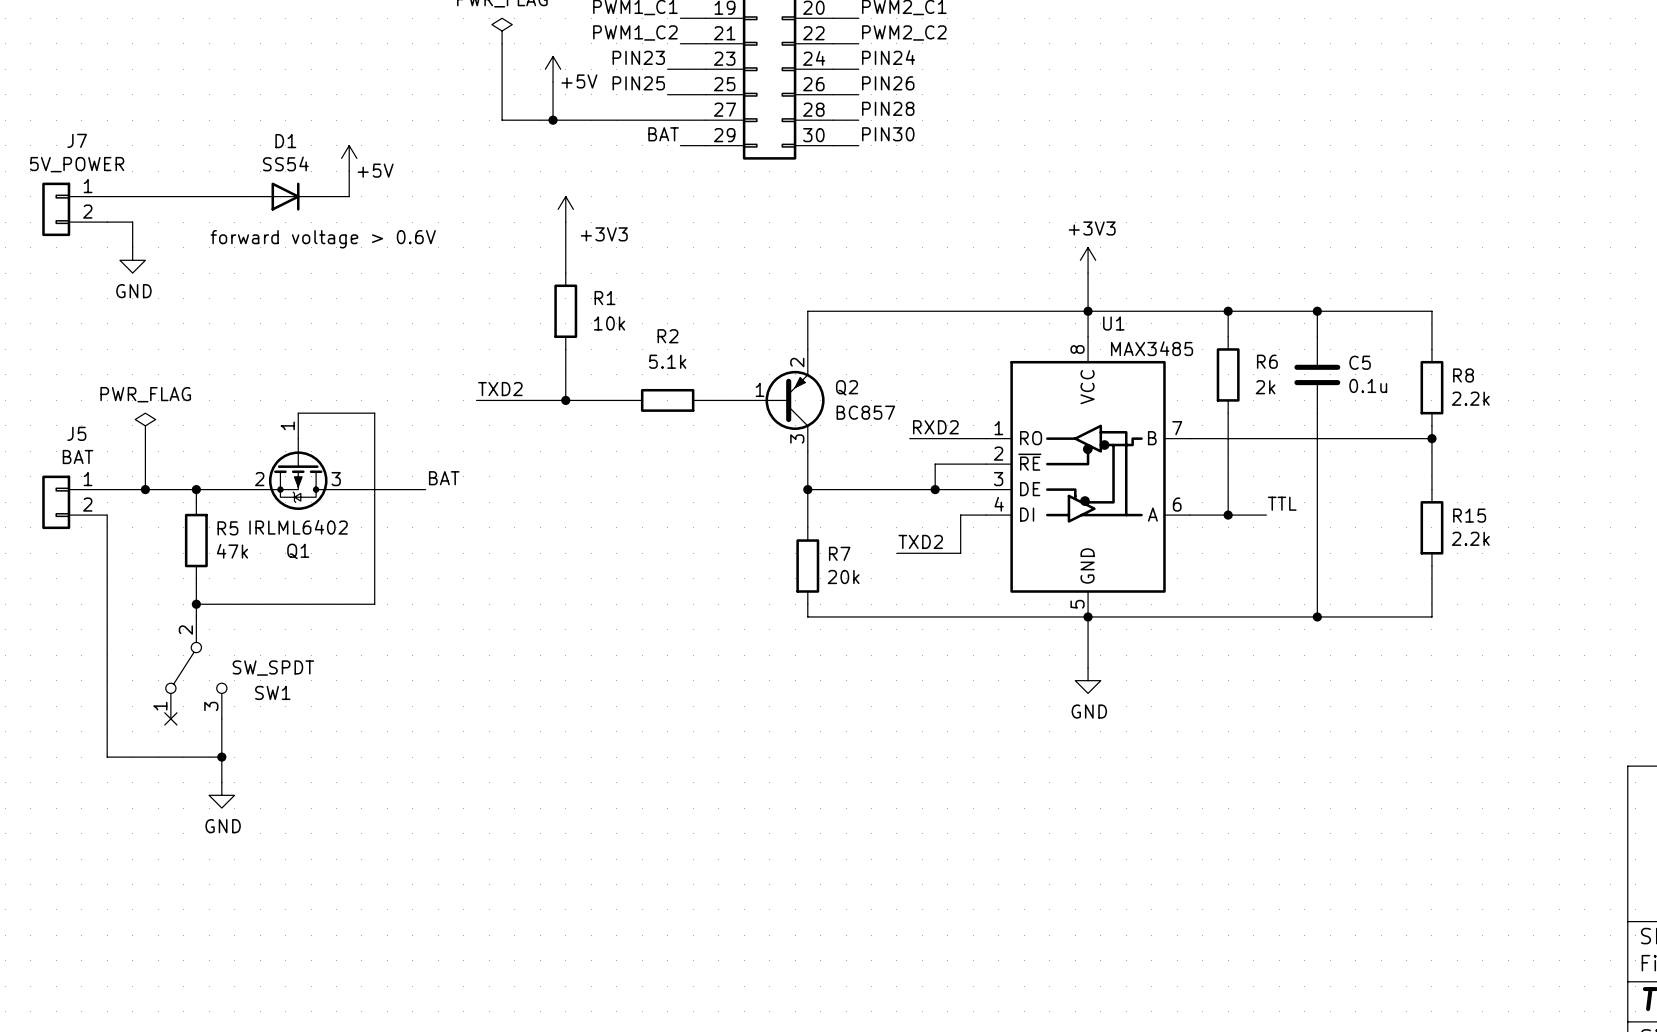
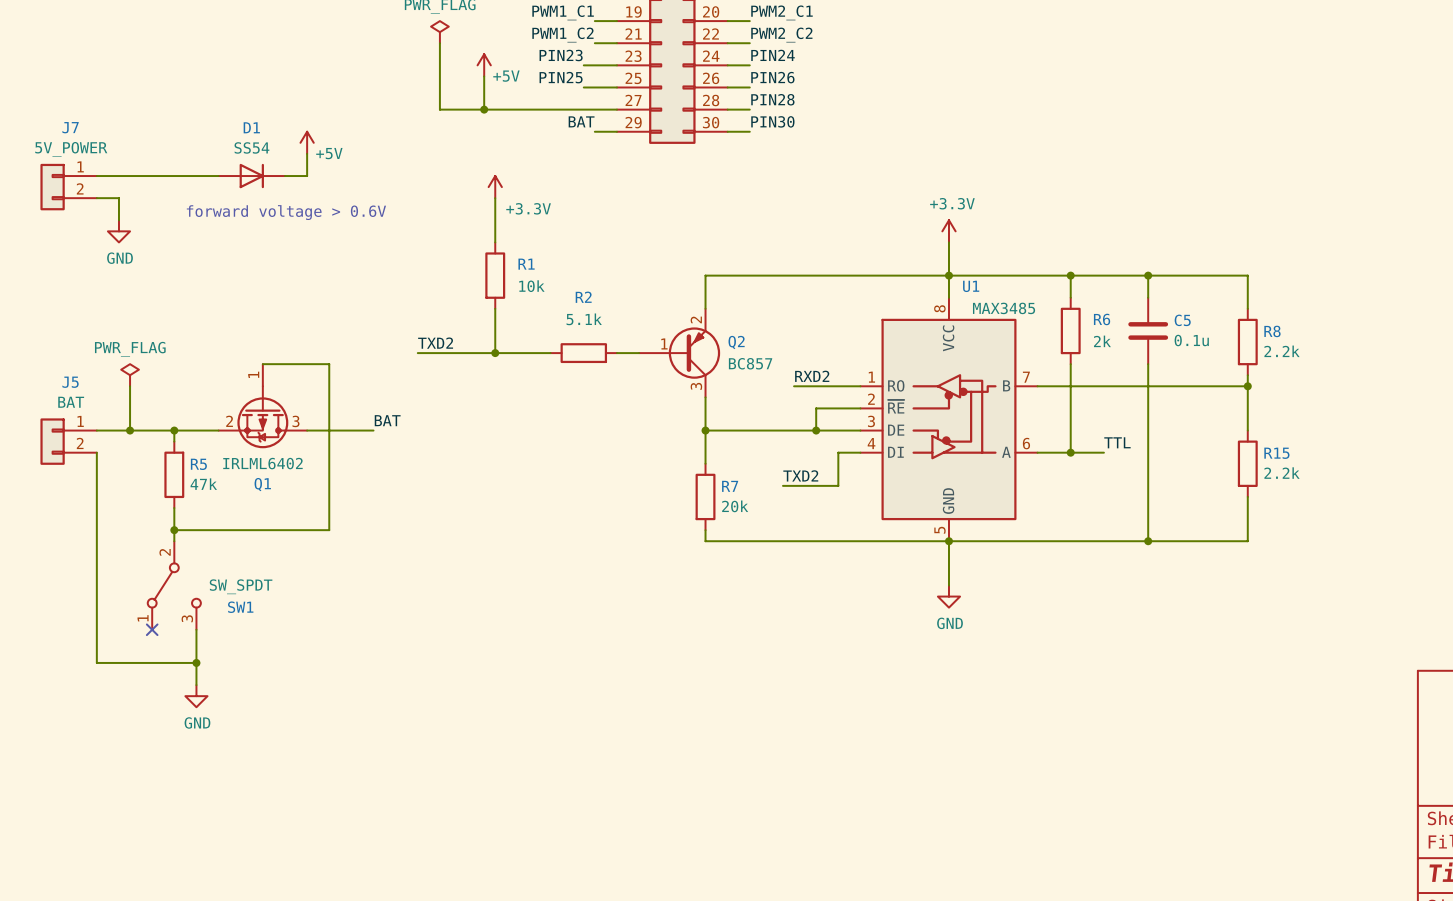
power symbol: +3V3 (565, 209) -> +3.3V (495, 187)
power symbol: +3V3 (1088, 260) -> +3.3V (948, 231)

